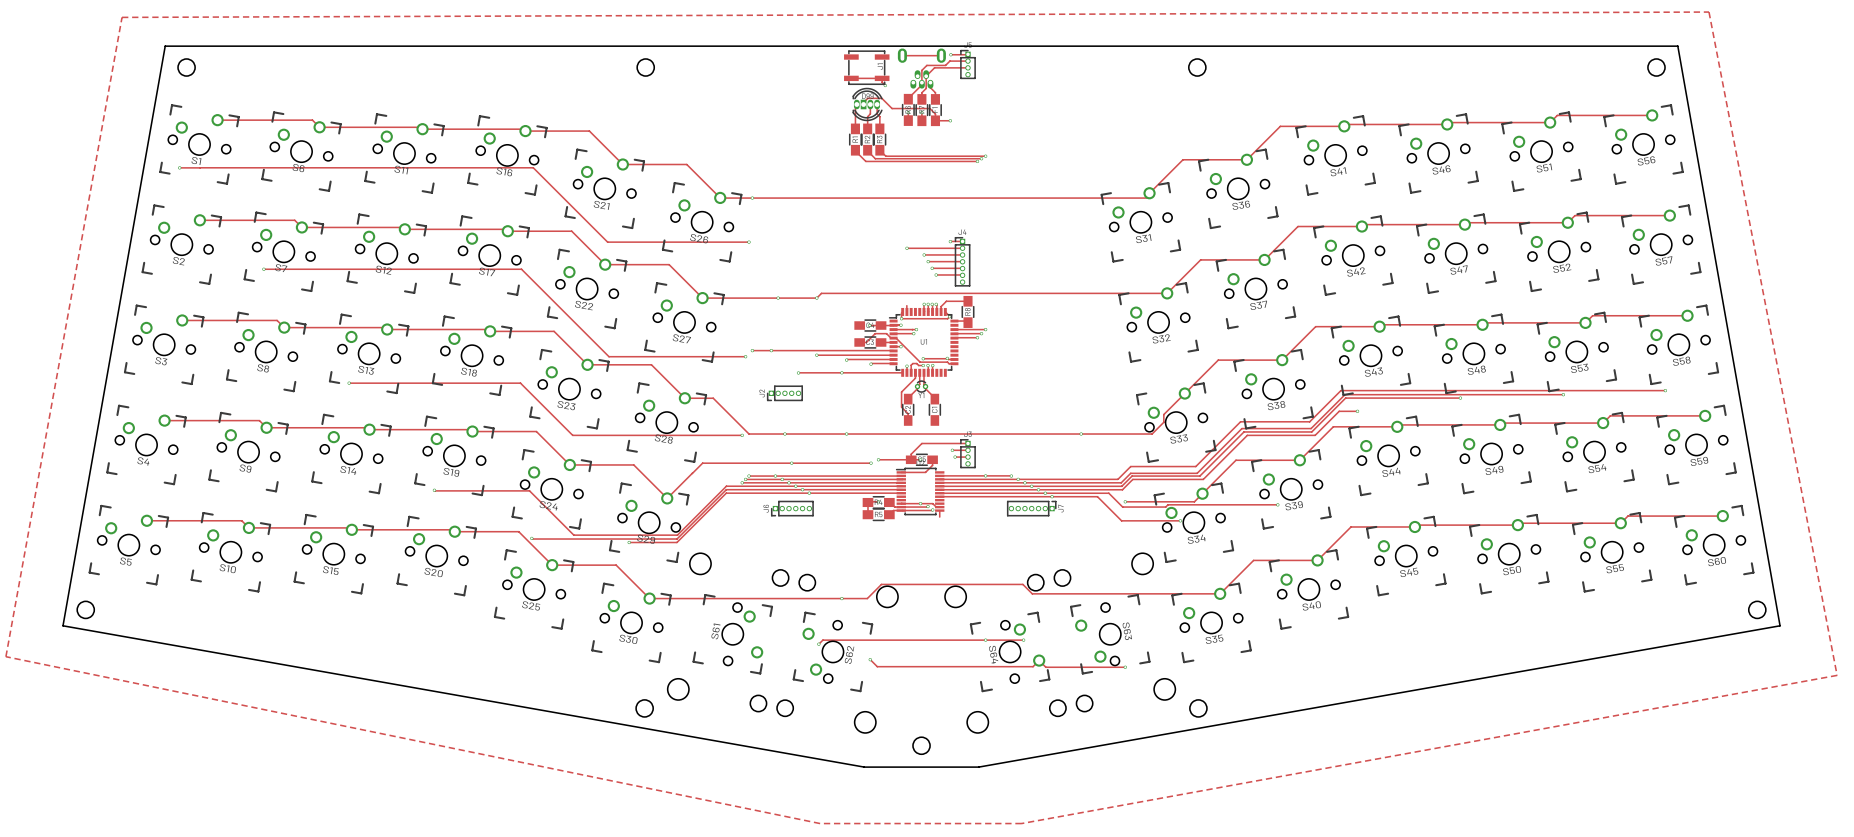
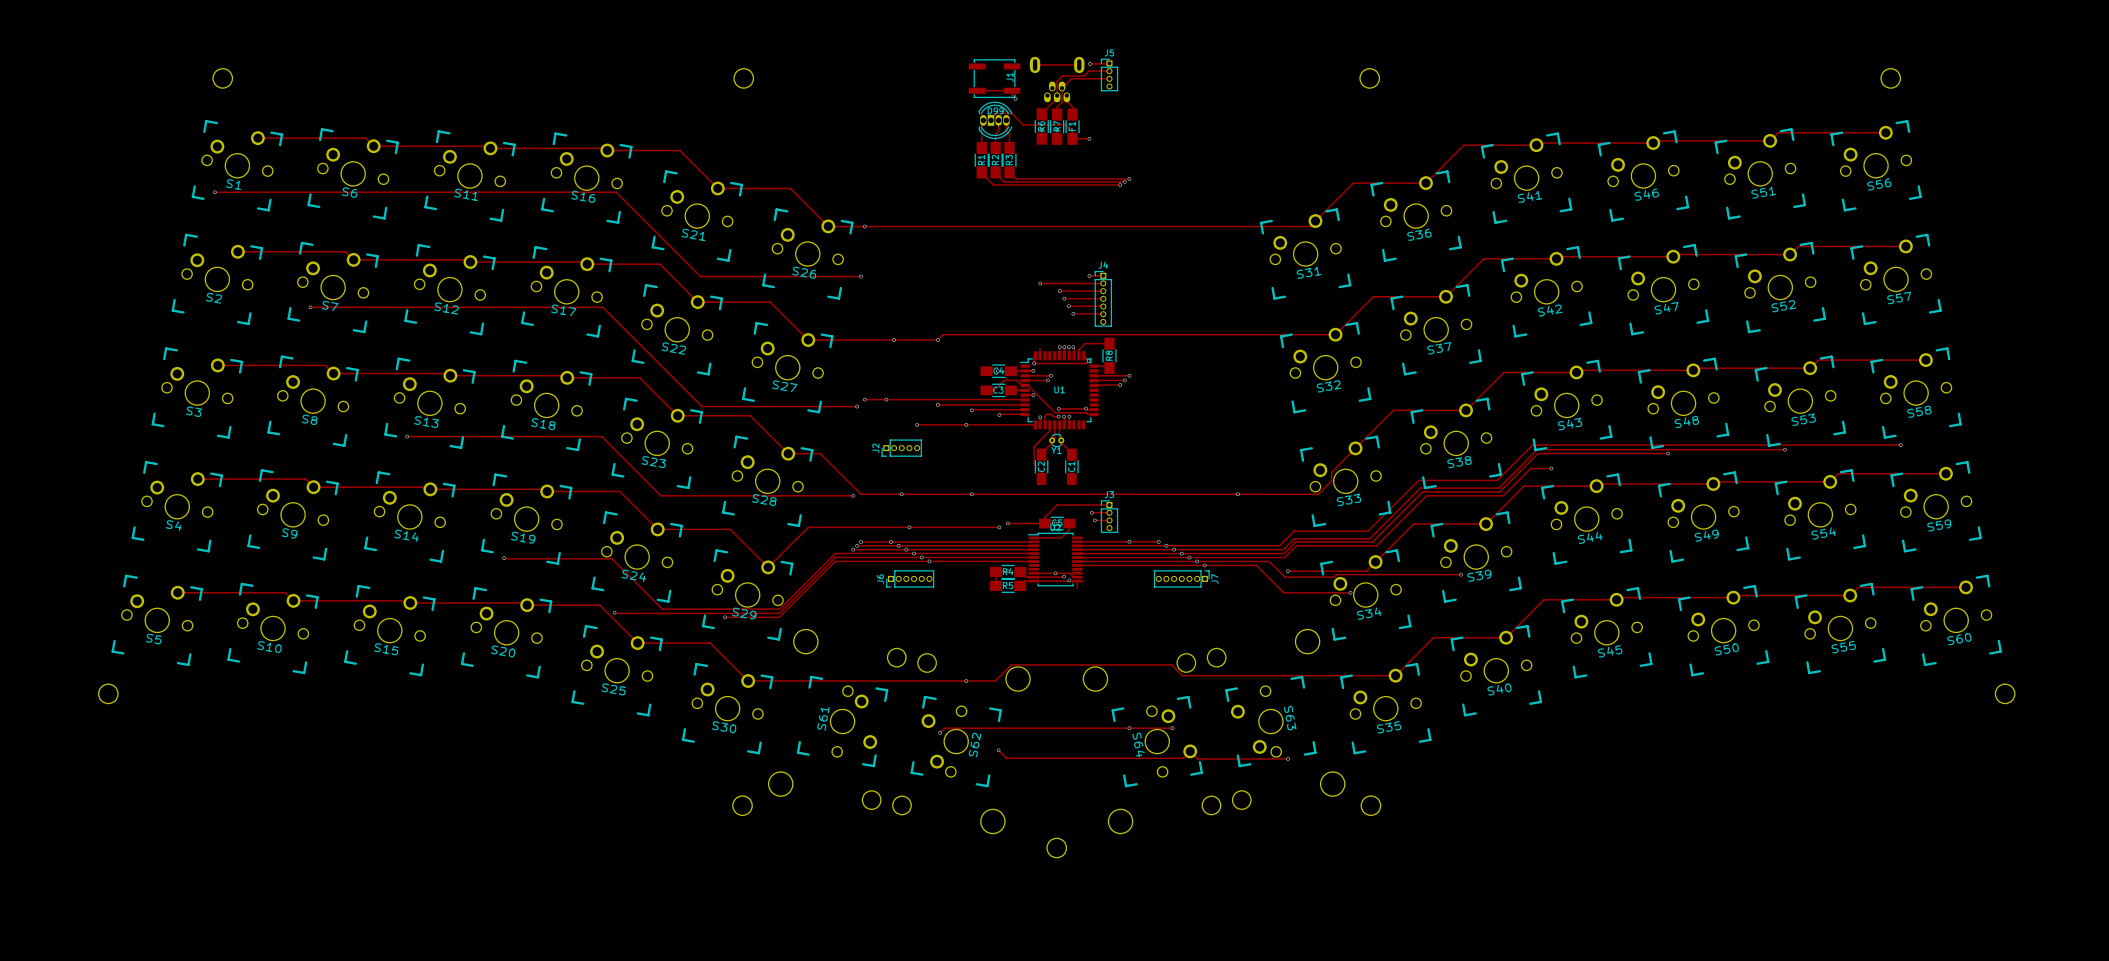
zone outline: (1709, 12) (122, 17) (5, 656) (820, 823) (1021, 823) (1837, 675) (1709, 12) -> none
board edge: (165, 46) (1677, 46) (1780, 625) (978, 767) (864, 767) (63, 625) (165, 46) -> none

